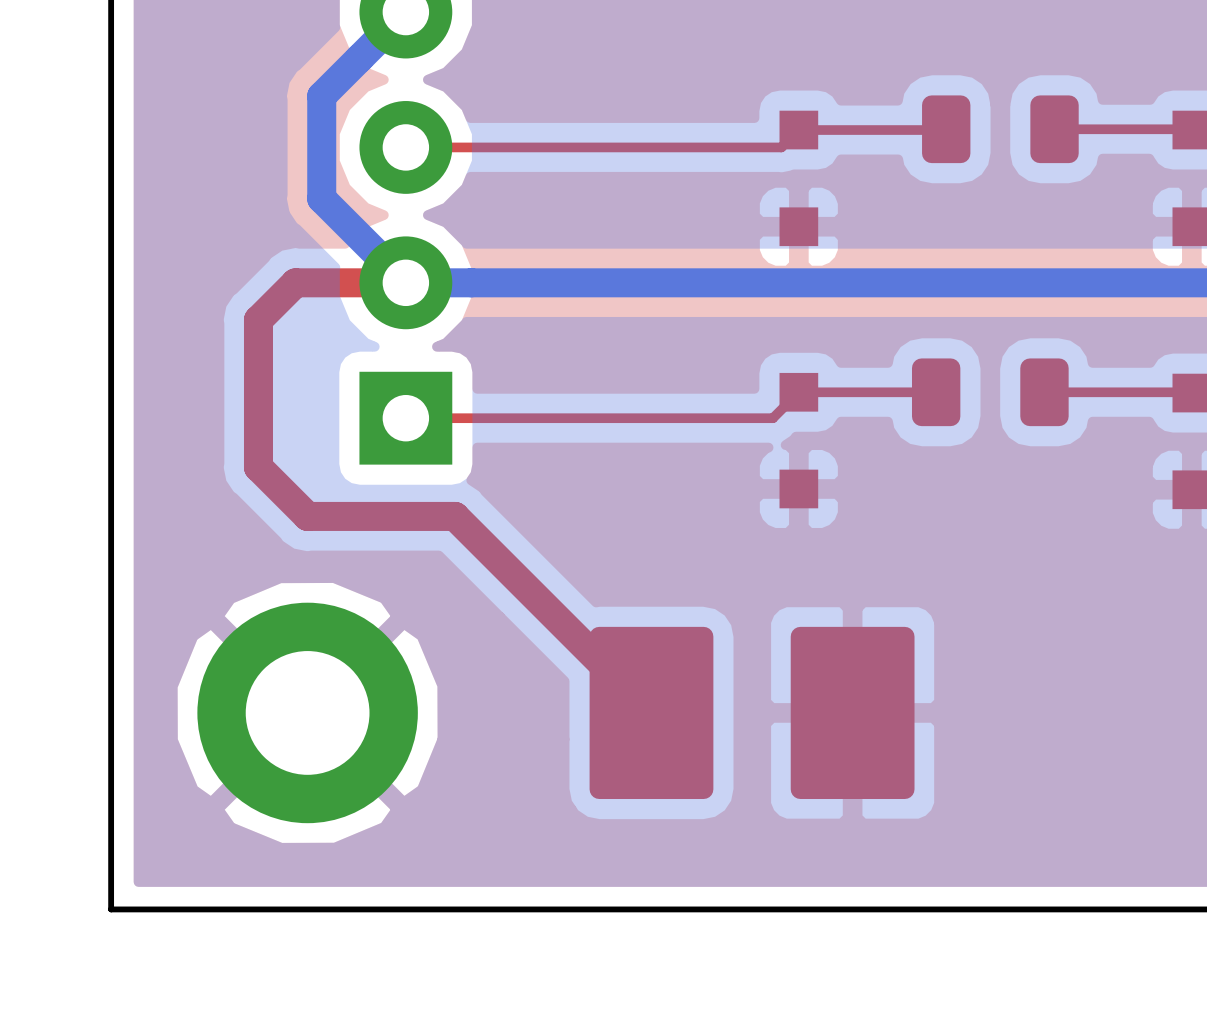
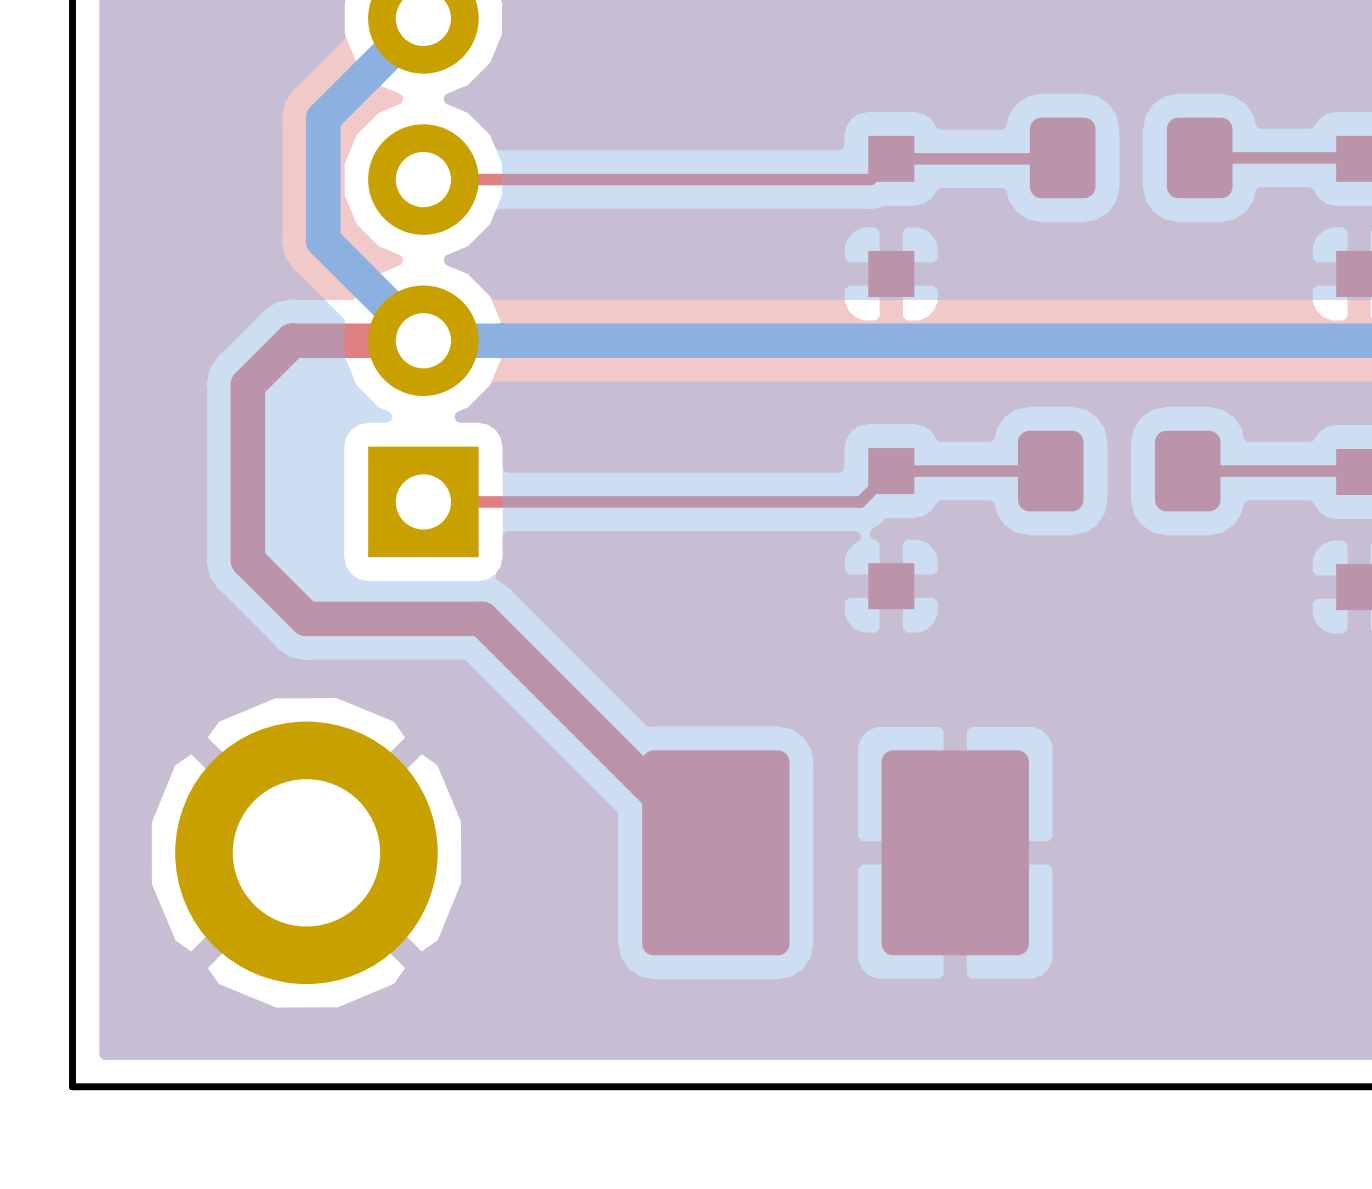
part footprint: [922, 95, 1079, 164] -> [1029, 117, 1233, 199]
part footprint: [911, 358, 1069, 427] -> [1017, 430, 1221, 512]

